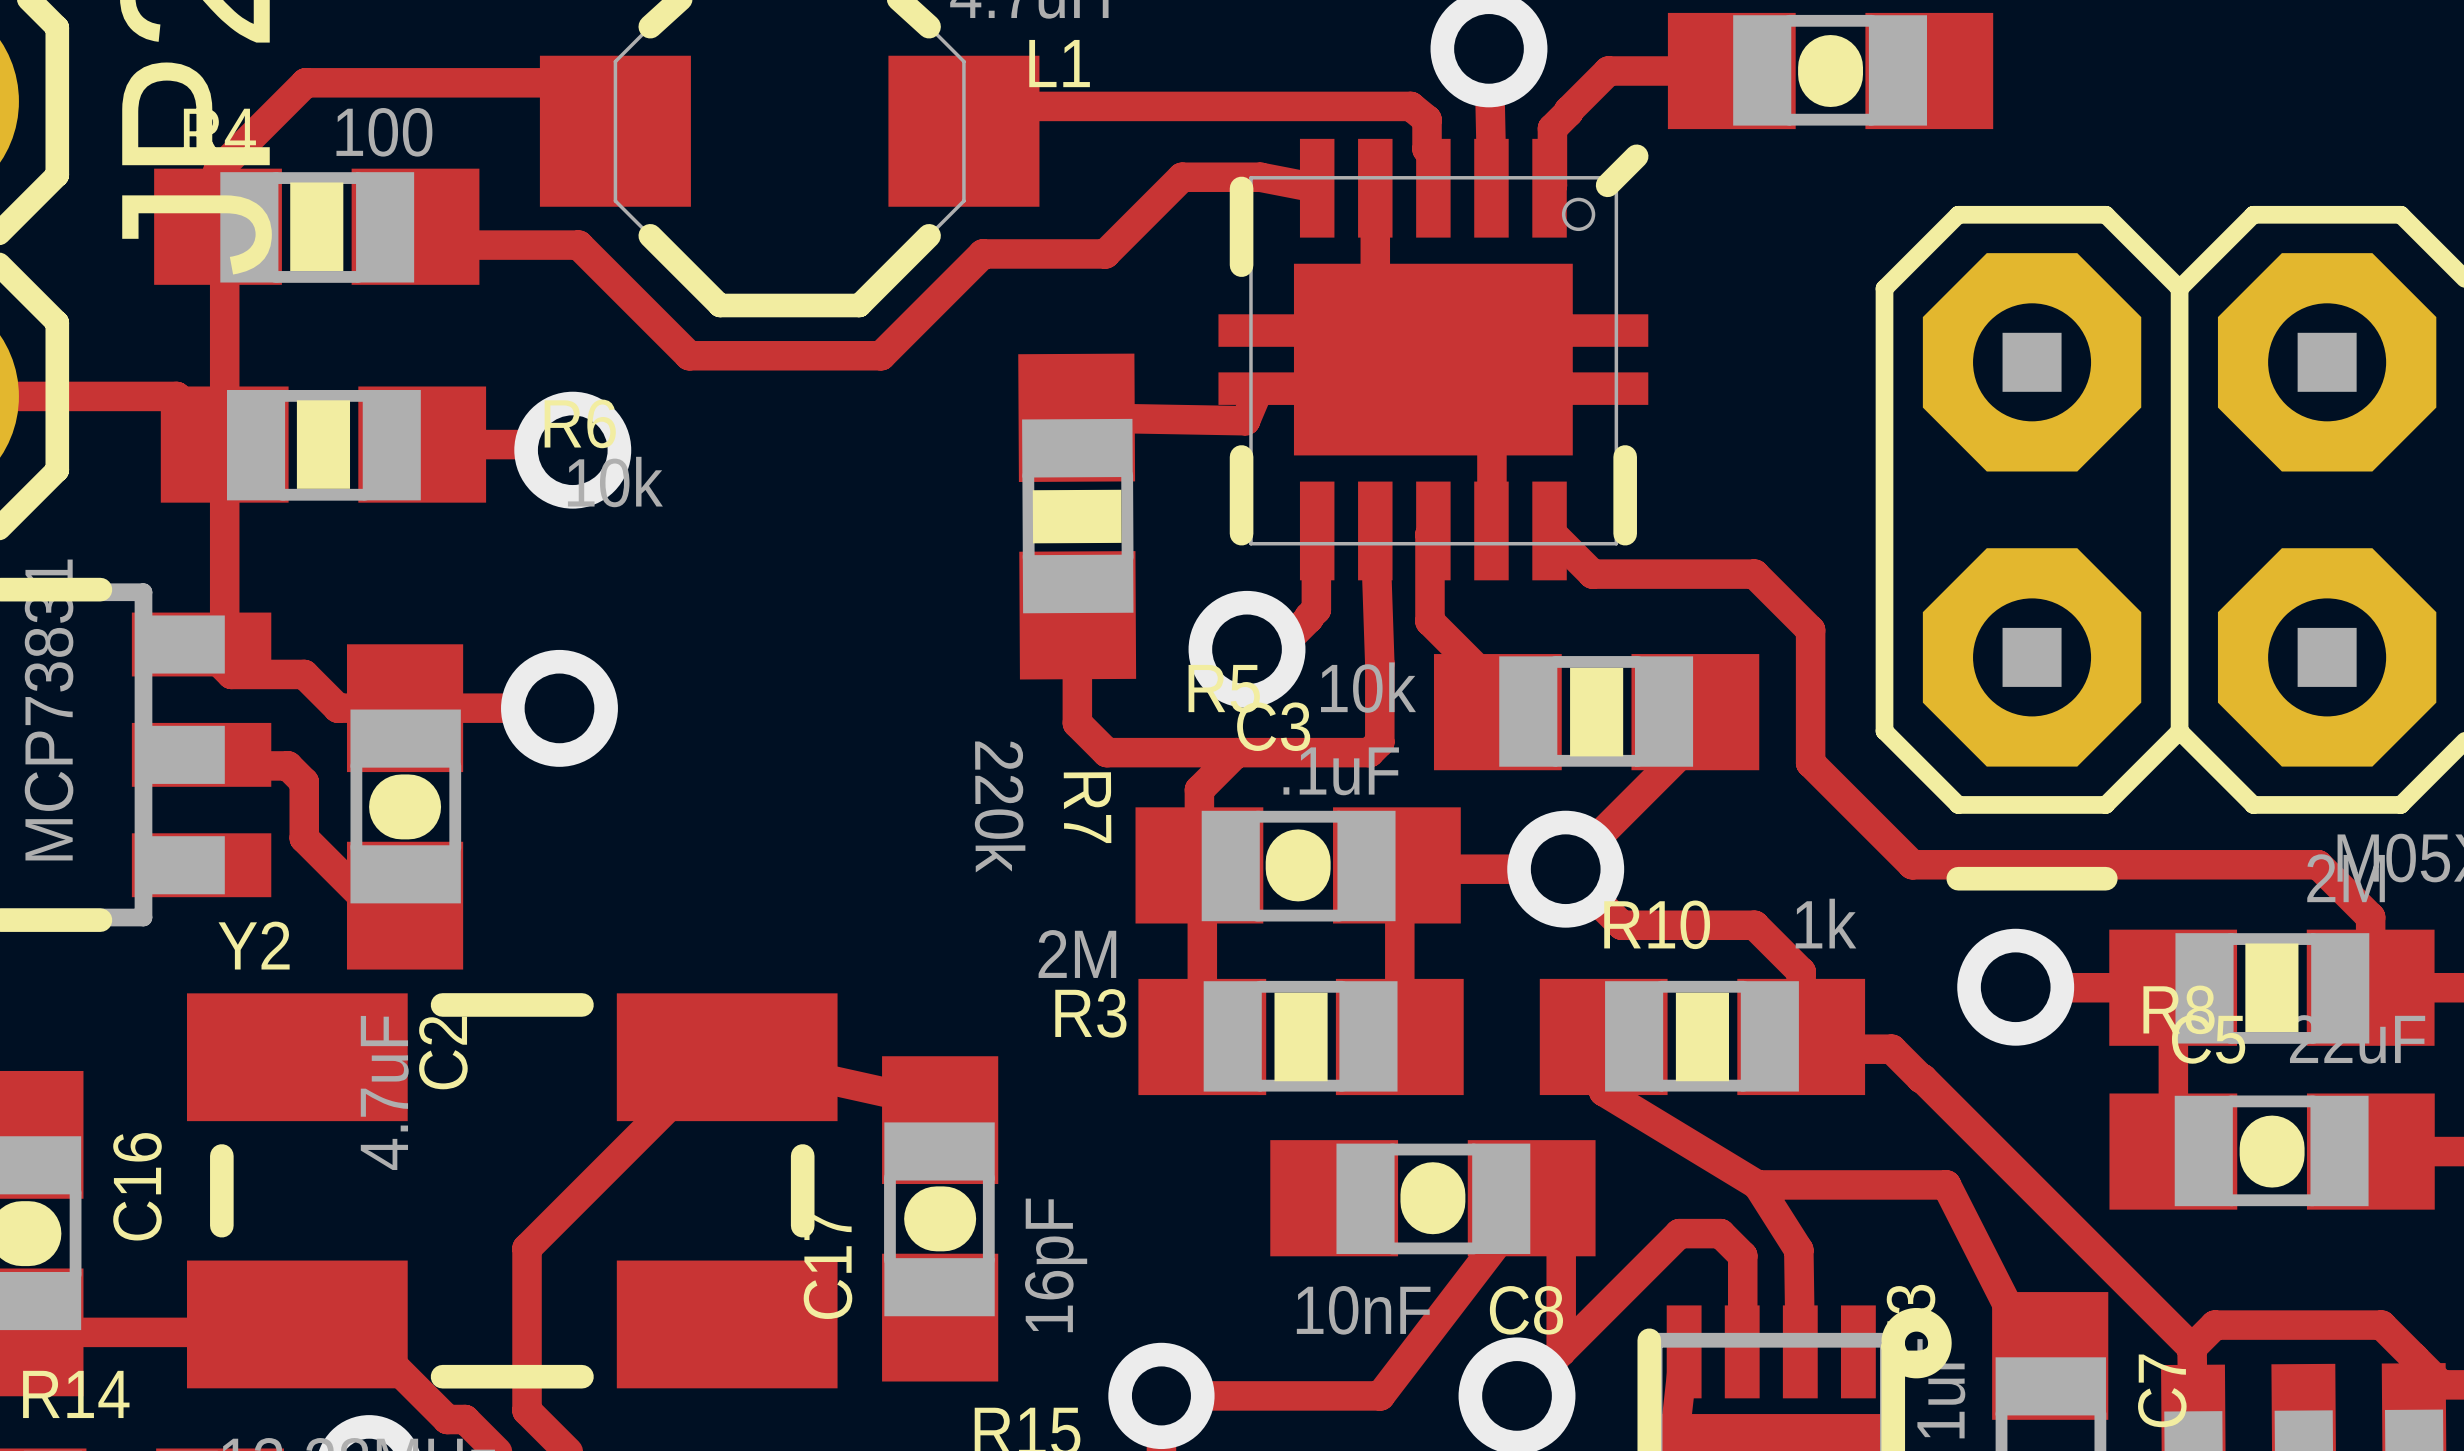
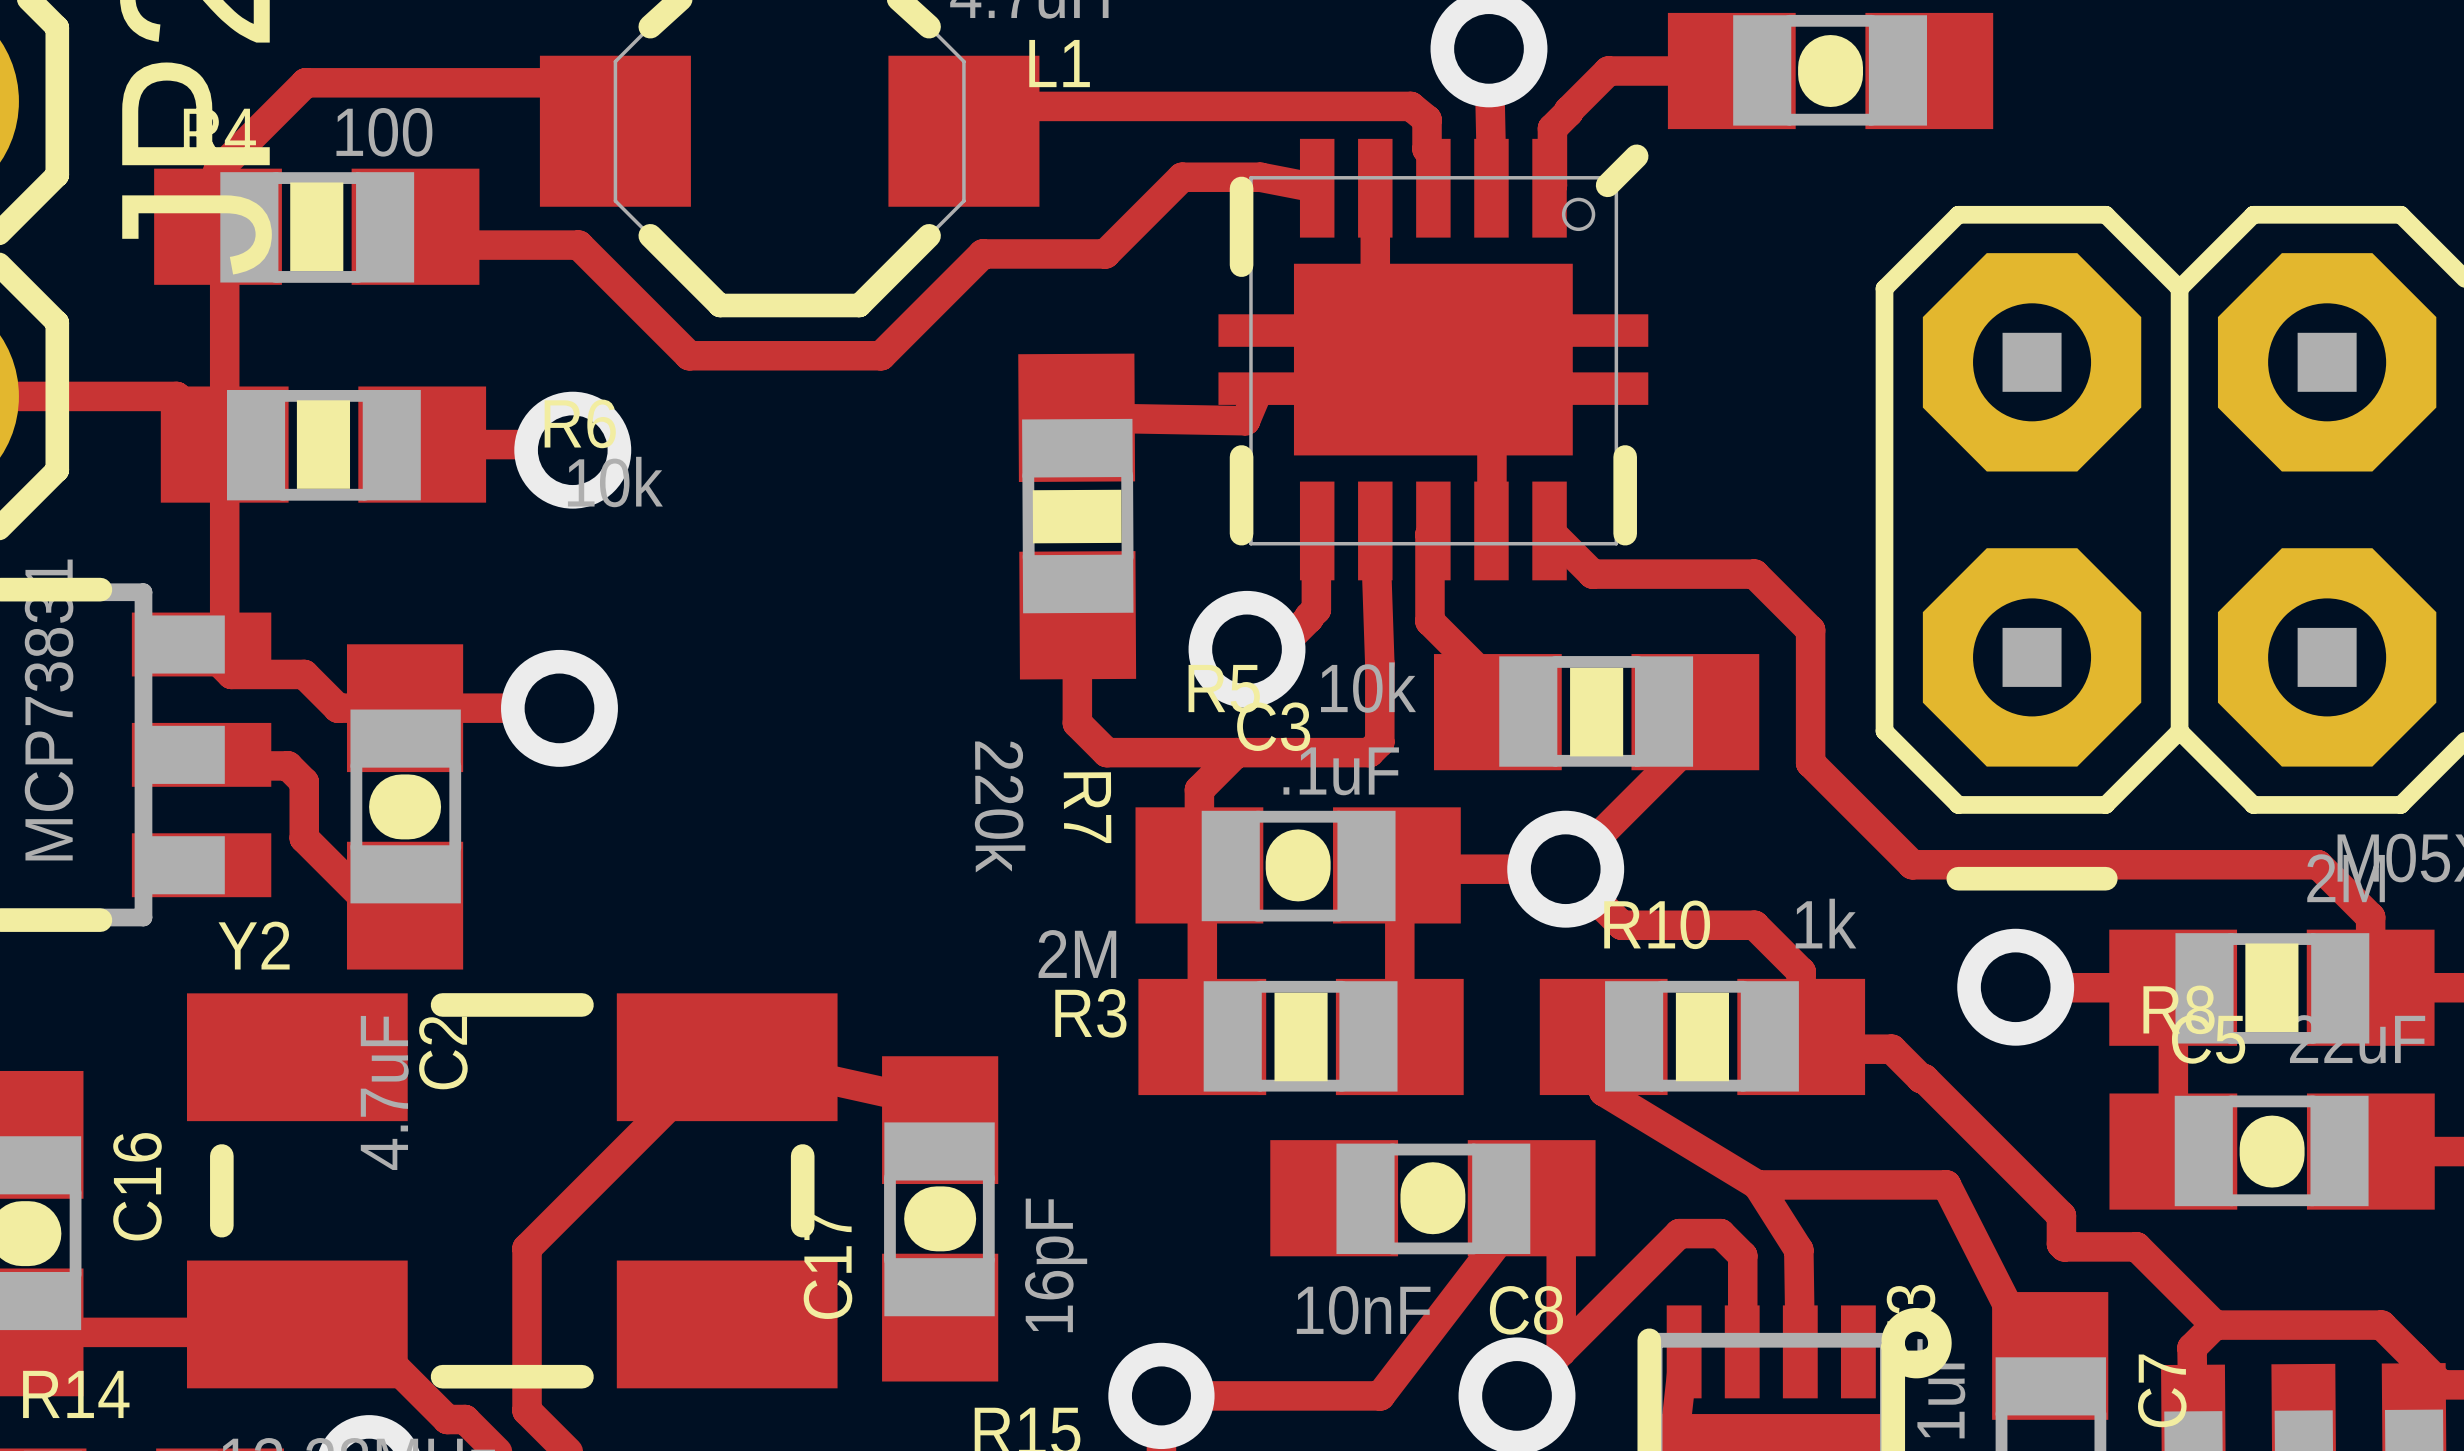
track: (1922, 1078) (2192, 1347) -> (1924, 1078) (2061, 1215) (2061, 1243) (2064, 1246) (2136, 1246) (2214, 1325)

